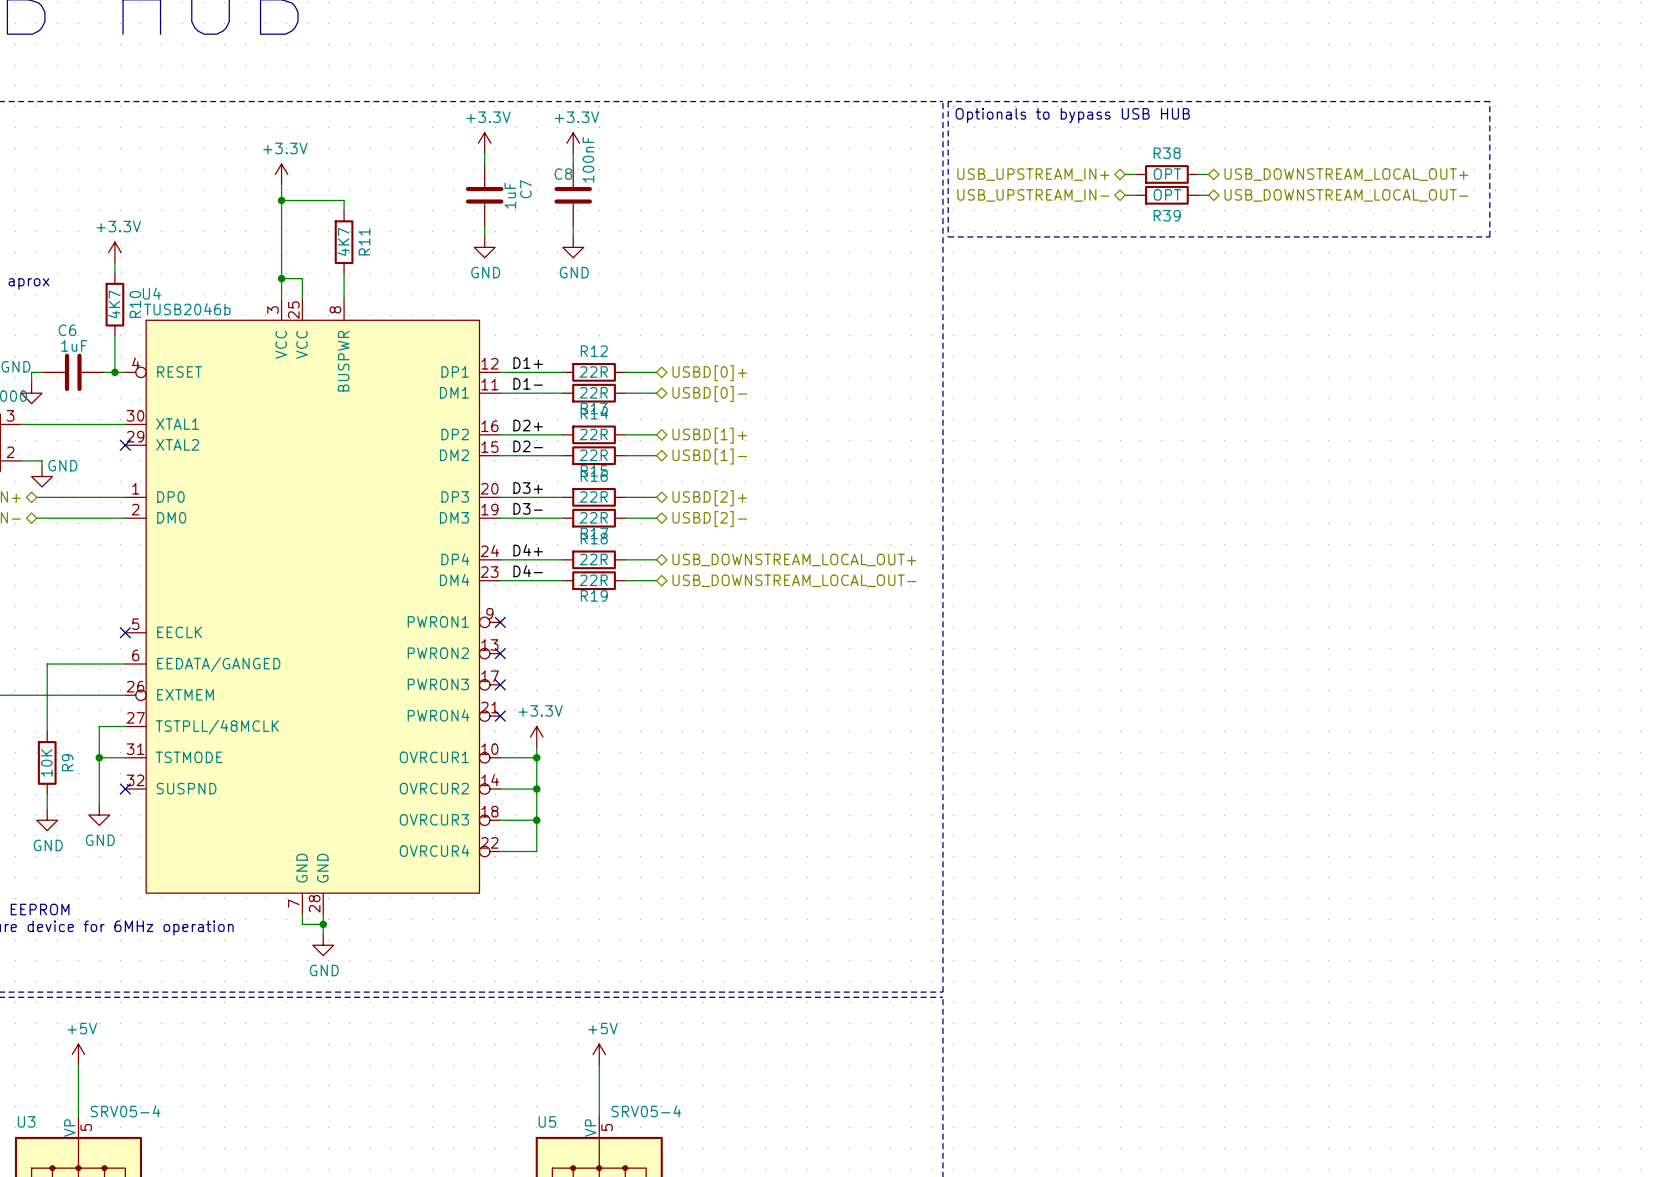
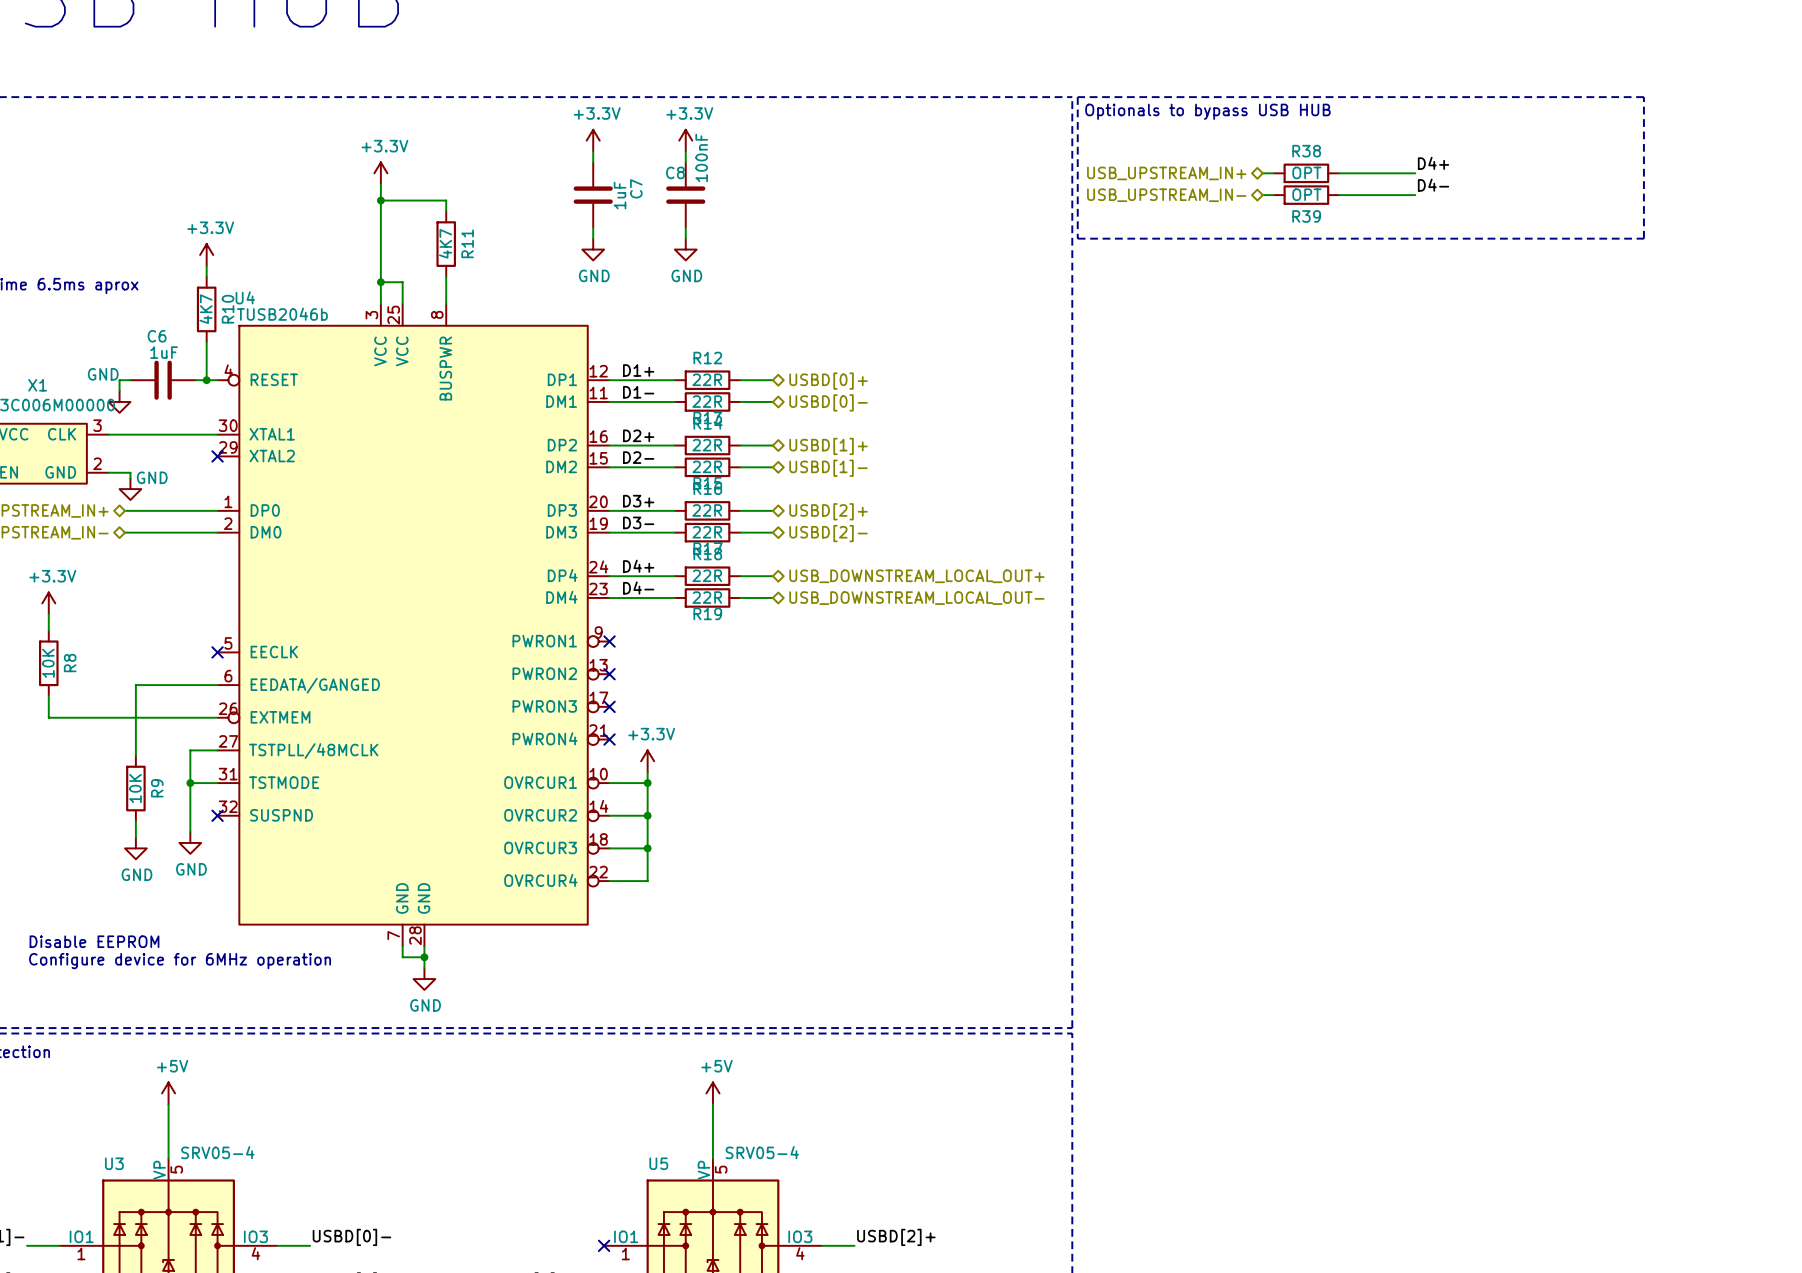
label: none -> D4+ (1433, 163)
wire: none -> (1349, 173) (1415, 173)
hierarchical label: USB_DOWNSTREAM_LOCAL_OUT+ (1346, 174) -> none
label: none -> D4- (1433, 185)
wire: none -> (1349, 195) (1415, 195)
hierarchical label: USB_DOWNSTREAM_LOCAL_OUT- (1346, 195) -> none

